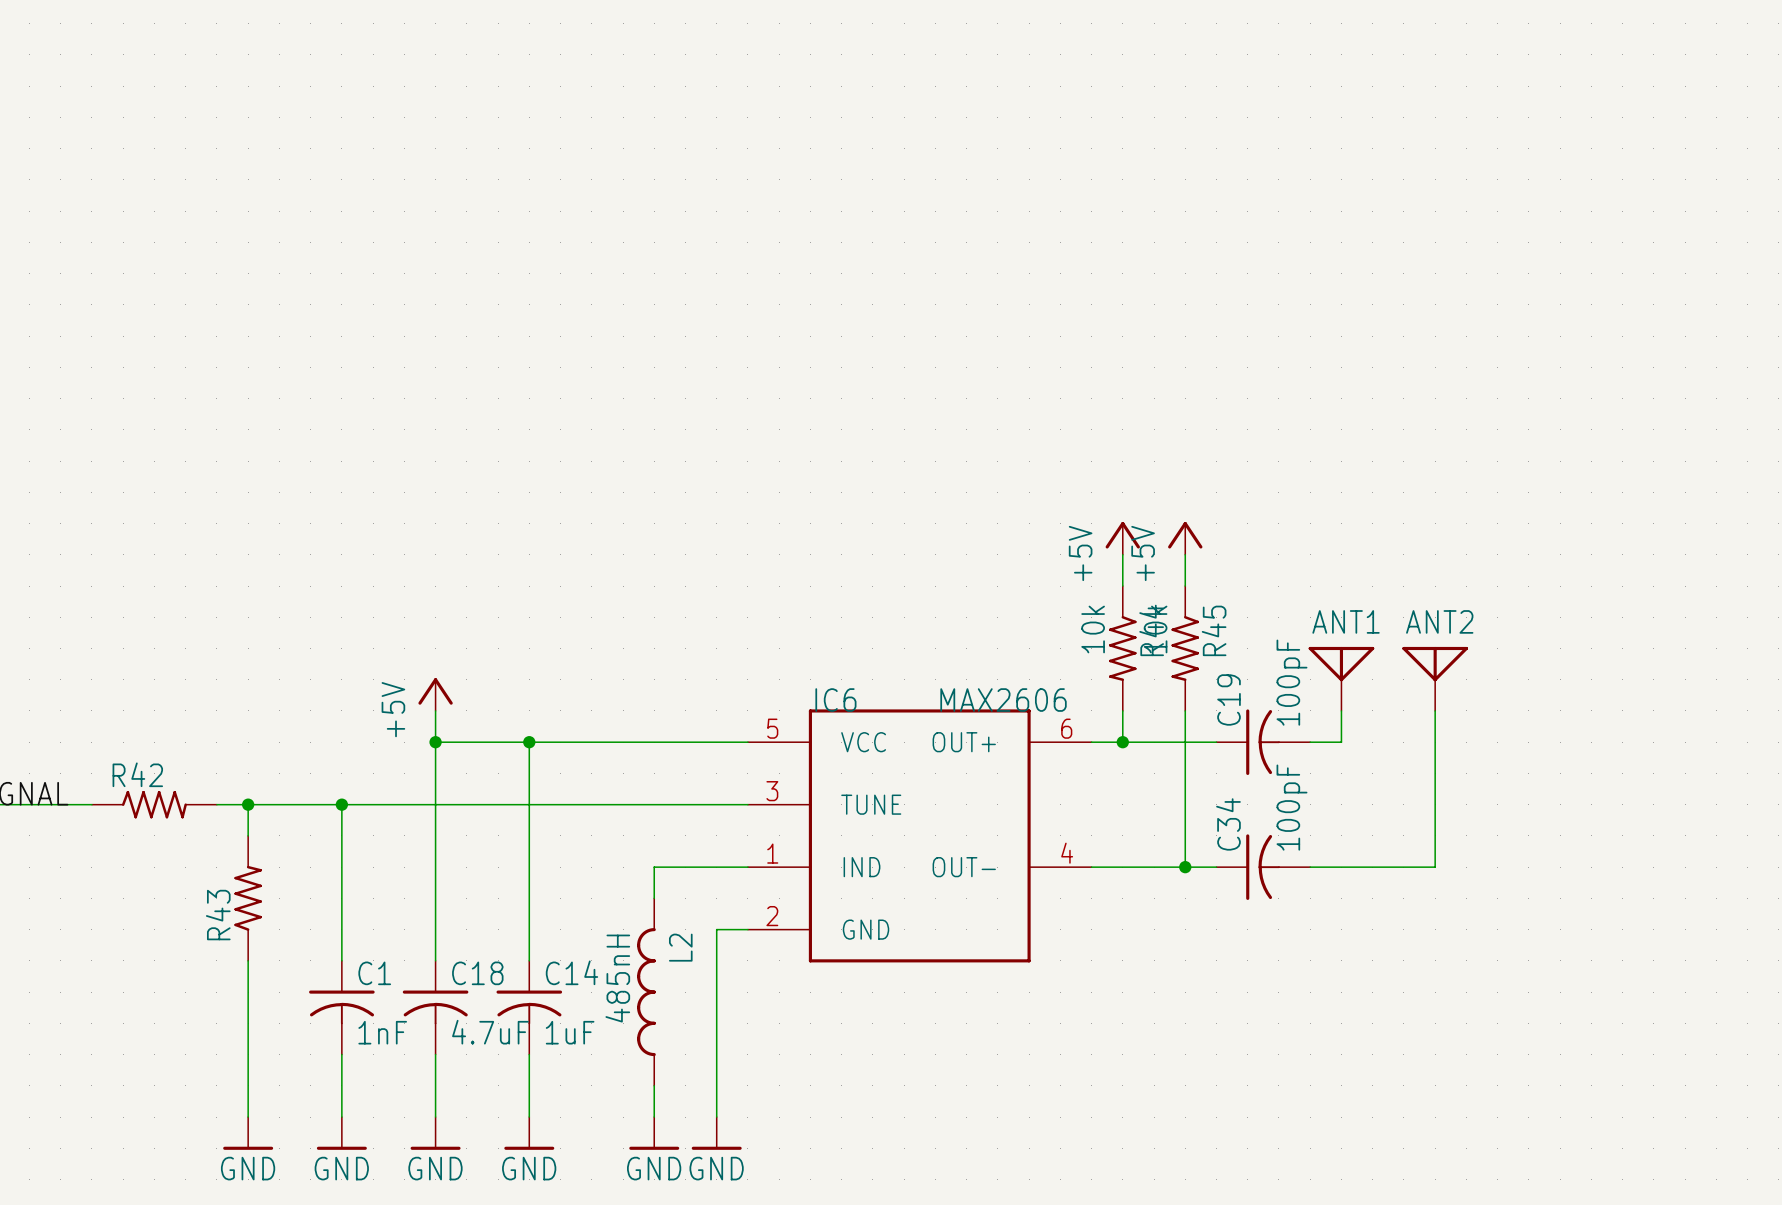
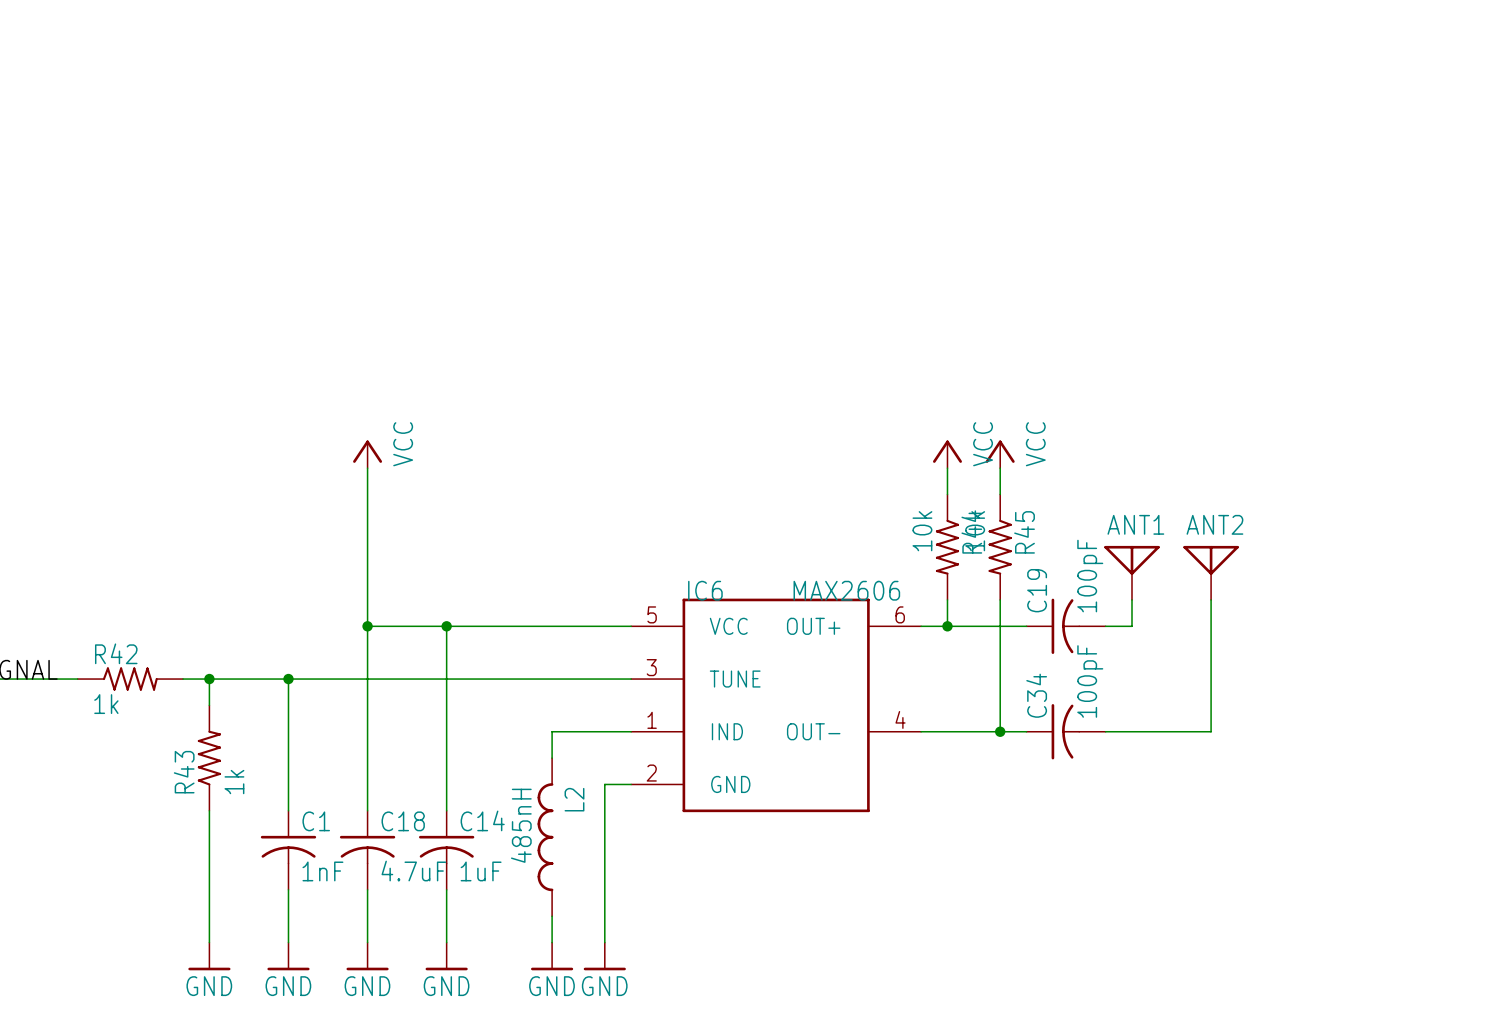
power symbol: none -> VCC (367, 454)
power symbol: +5V (1122, 538) -> VCC (947, 454)
power symbol: +5V (1185, 538) -> VCC (1000, 454)
wire: none -> (367, 468) (367, 599)
power symbol: +5V (435, 694) -> none
R42 value: none -> 1k (106, 704)
R43 value: none -> 1k (234, 782)

